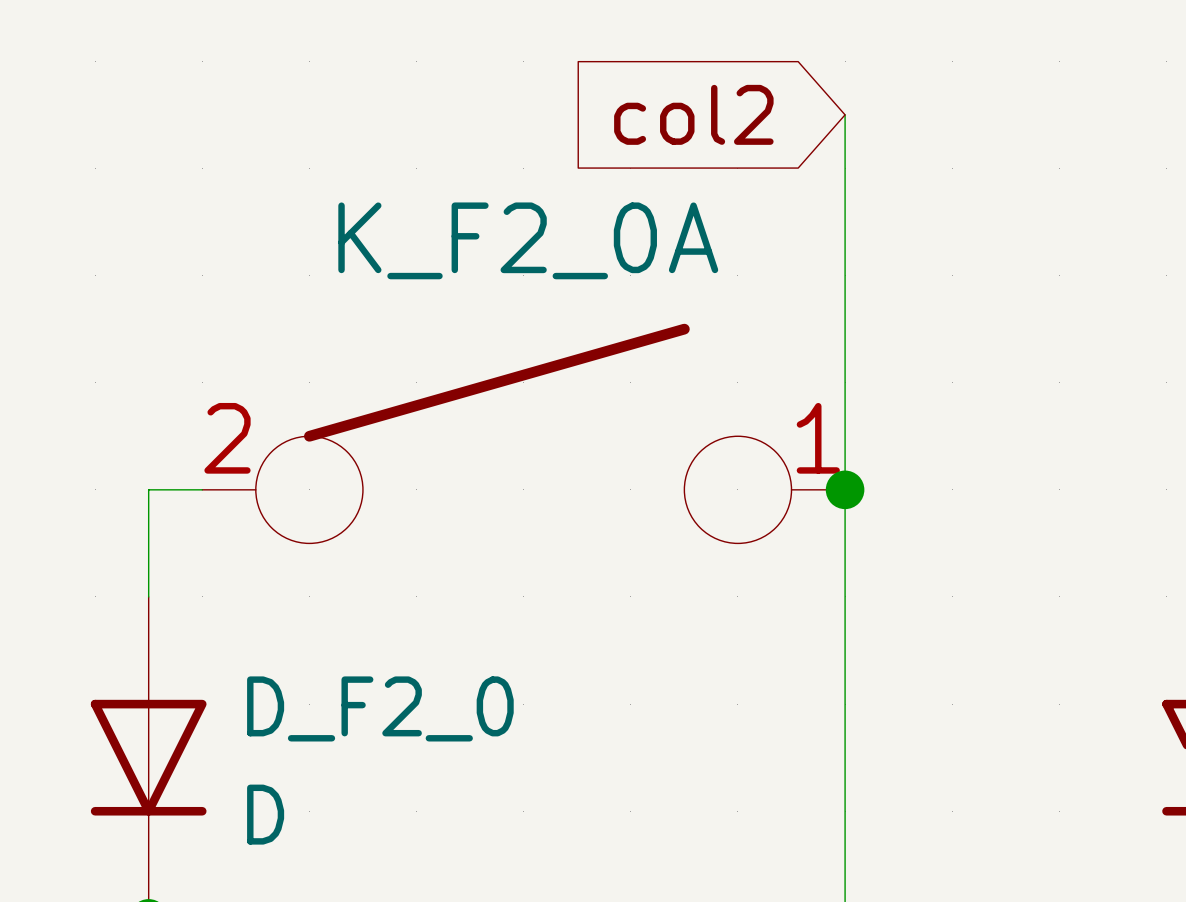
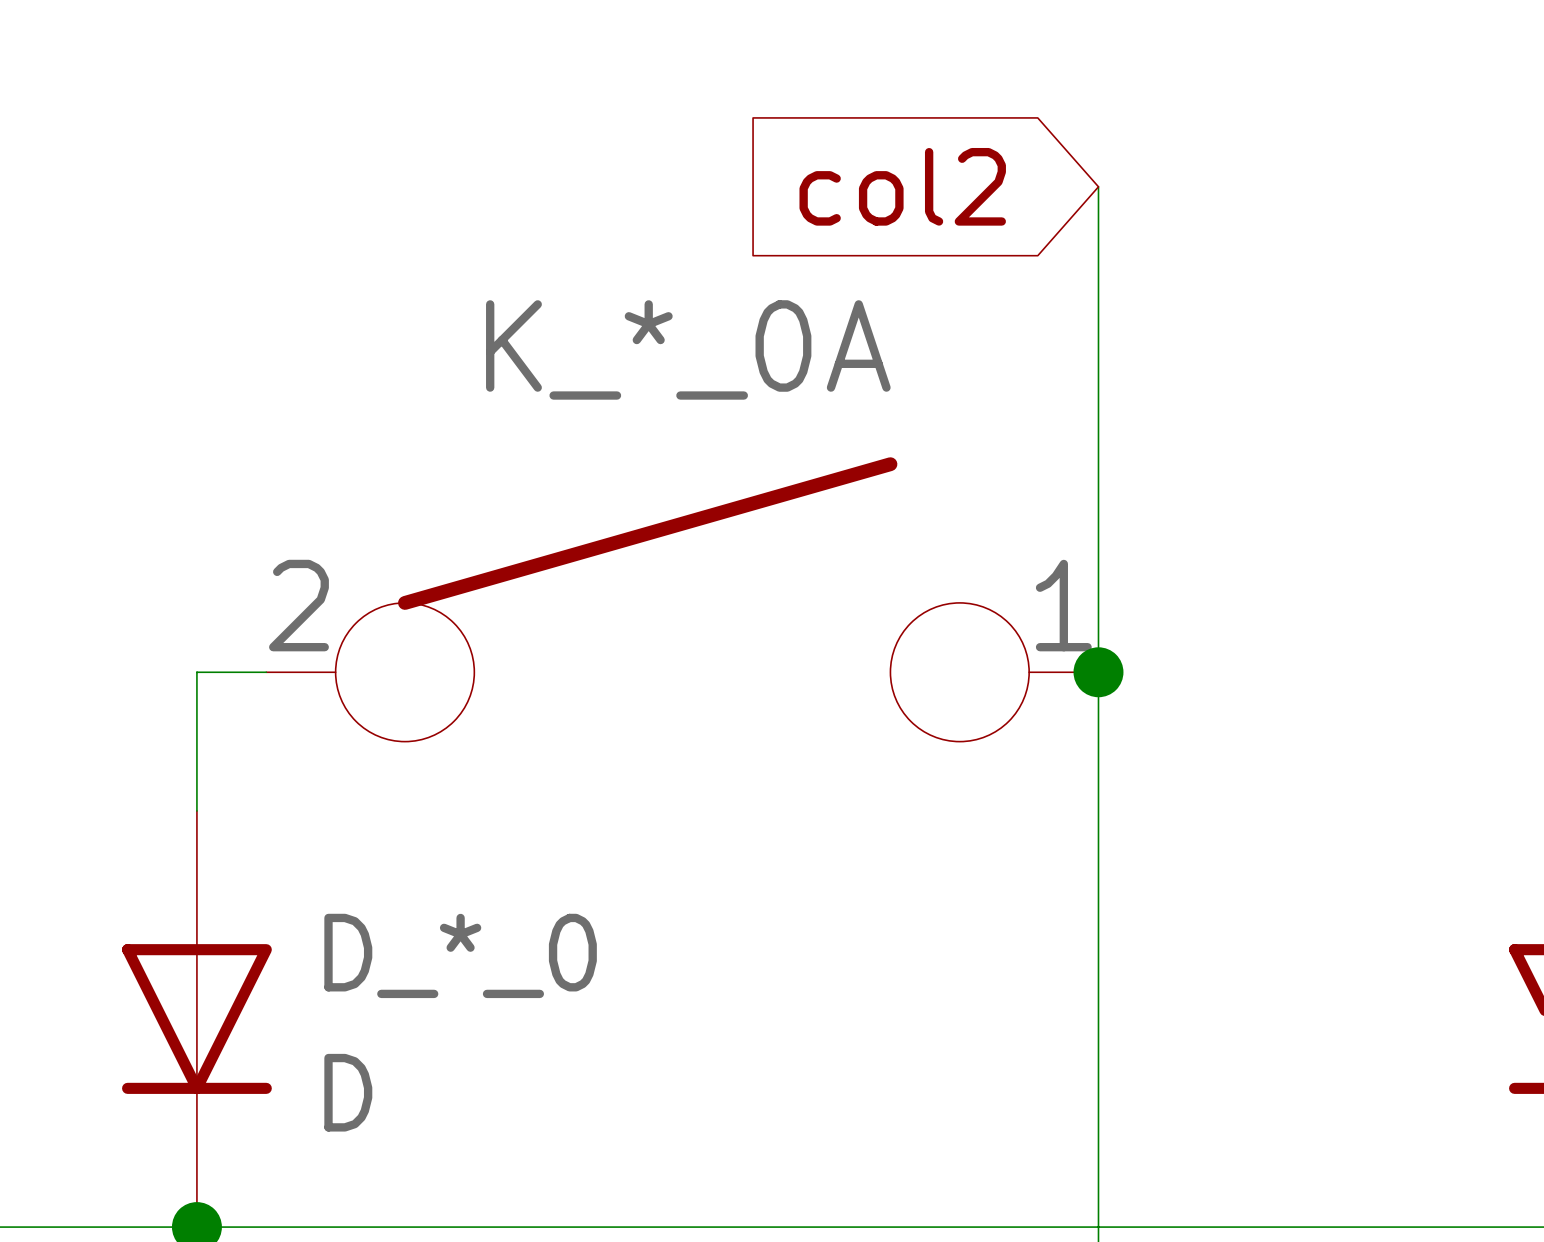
K_F2_0A name: K_F2_0A (528, 240) -> K_*_0A (688, 349)
D_F2_0 name: D_F2_0 (380, 708) -> D_*_0 (460, 955)

